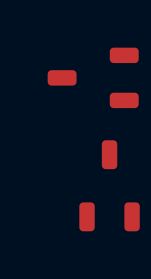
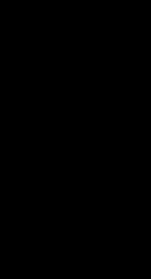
part: (93, 77) -> none
part: (109, 185) -> none

